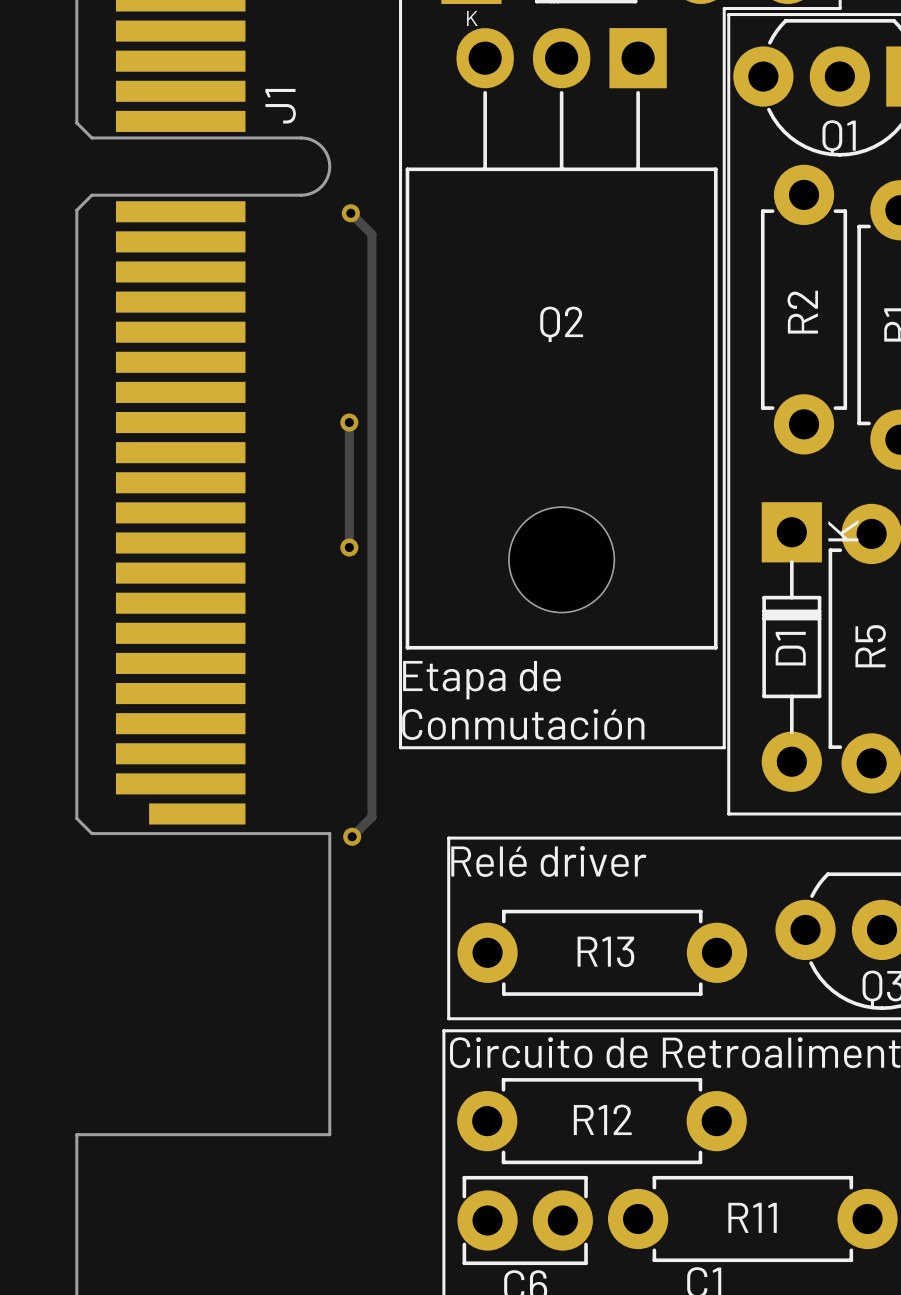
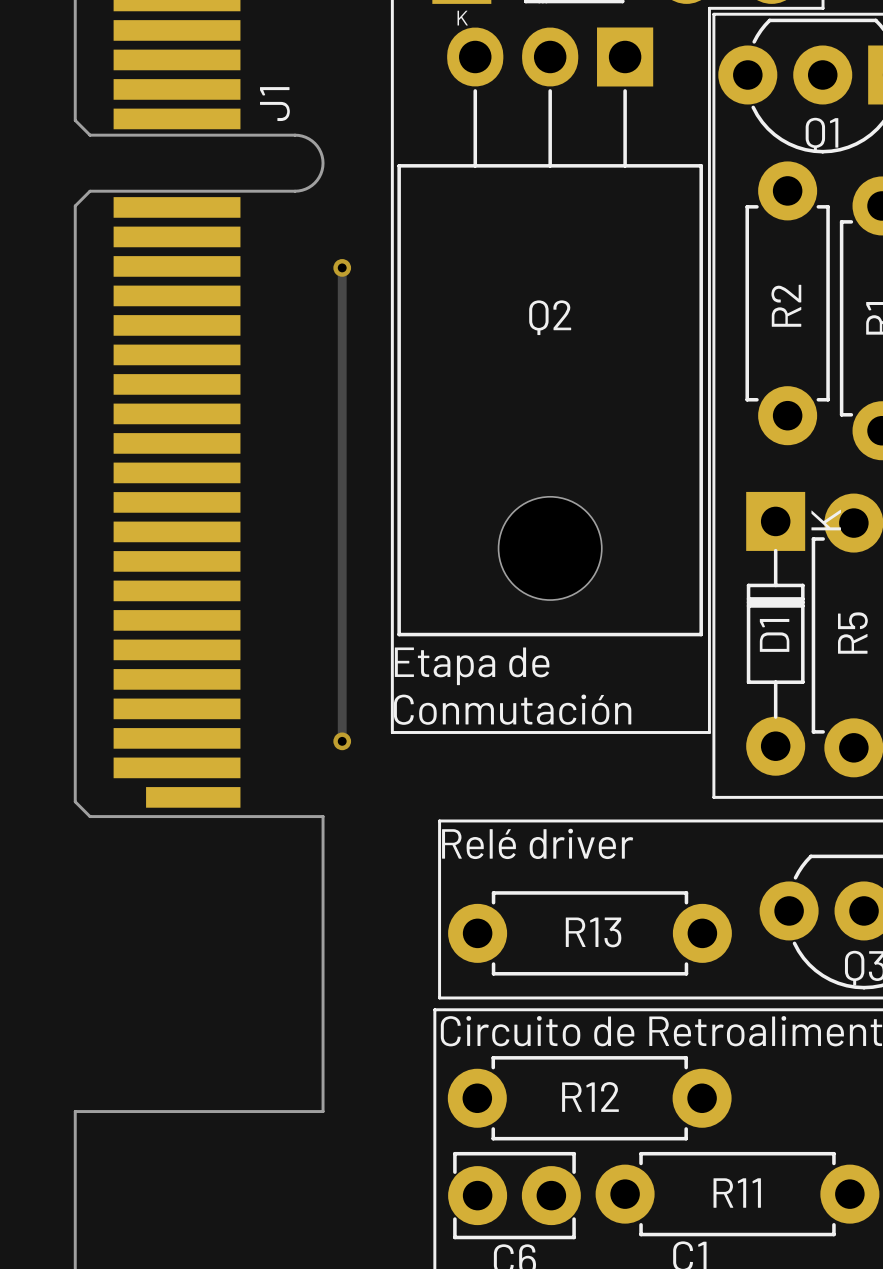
track: (350, 213) (371, 234) (371, 816) (352, 836) -> none
via position: (350, 213) -> (342, 267)
track: none -> (342, 267) (342, 413)
via: (349, 422) -> none
track: none -> (342, 536) (342, 741)
via: (349, 547) -> none
via position: (352, 836) -> (342, 741)

